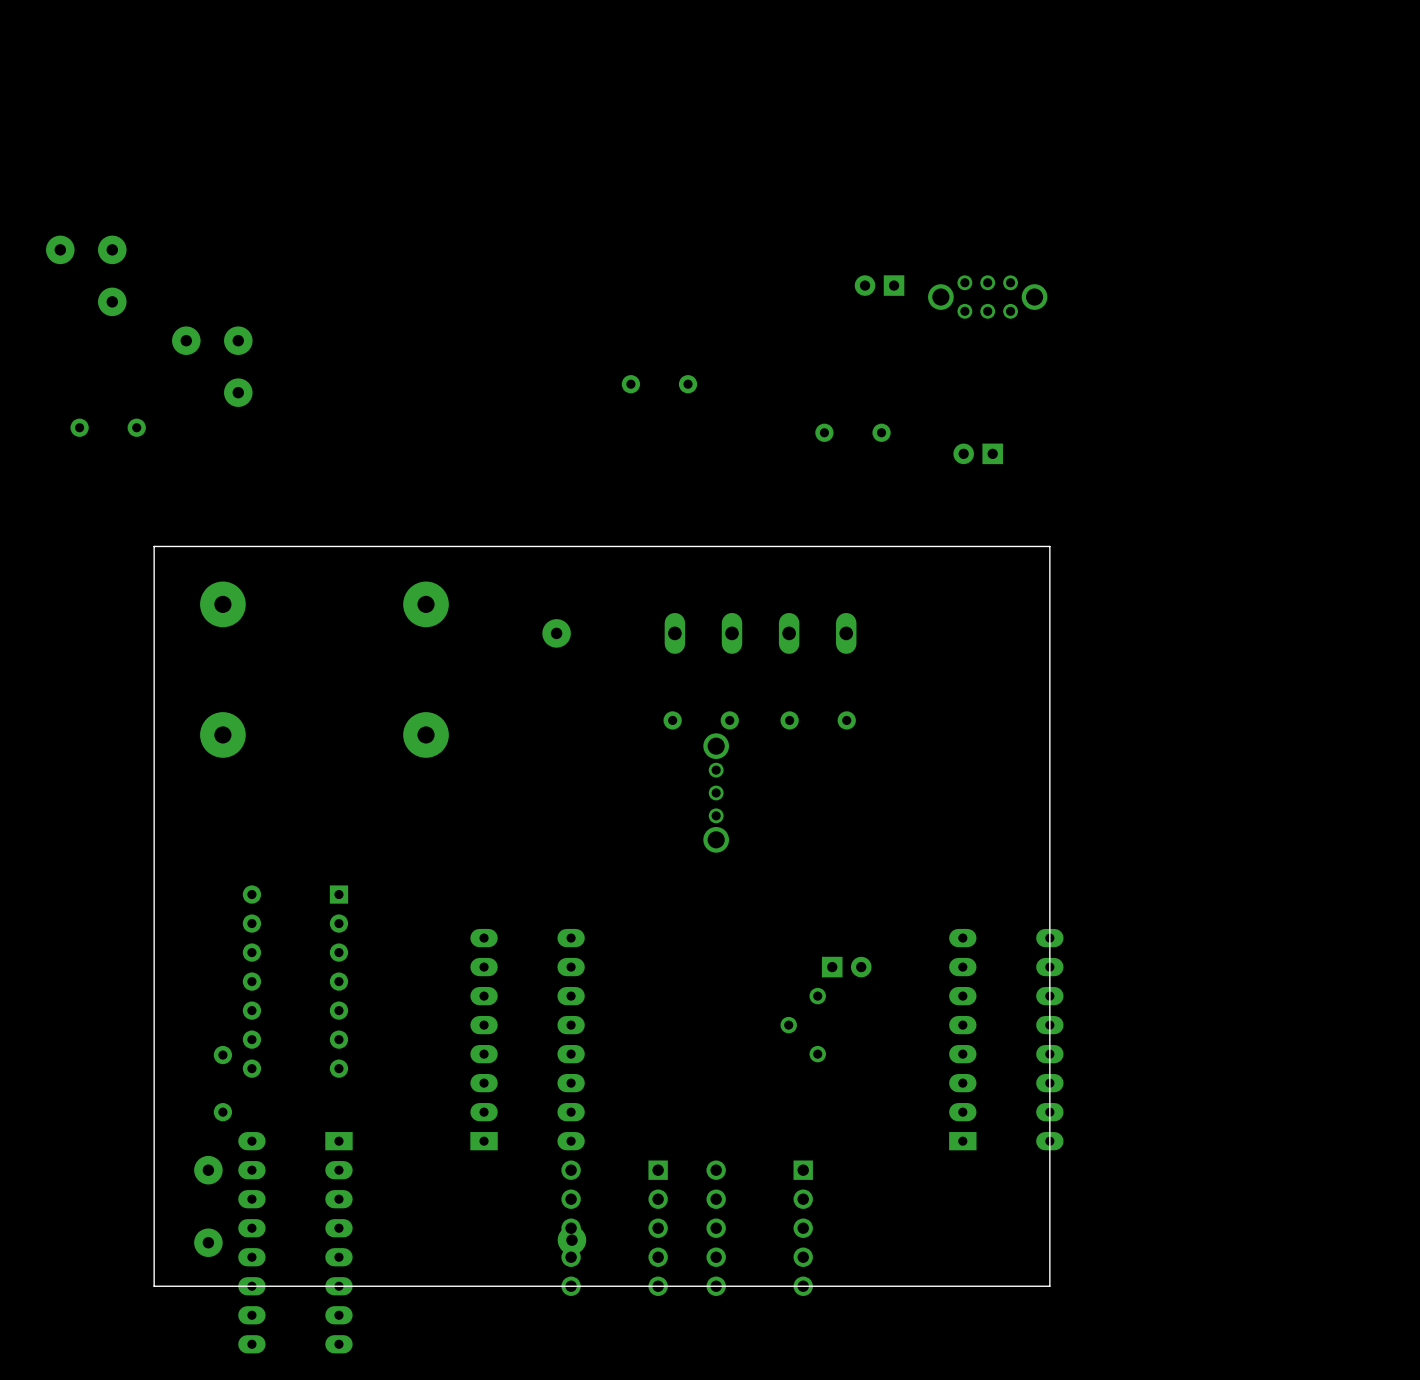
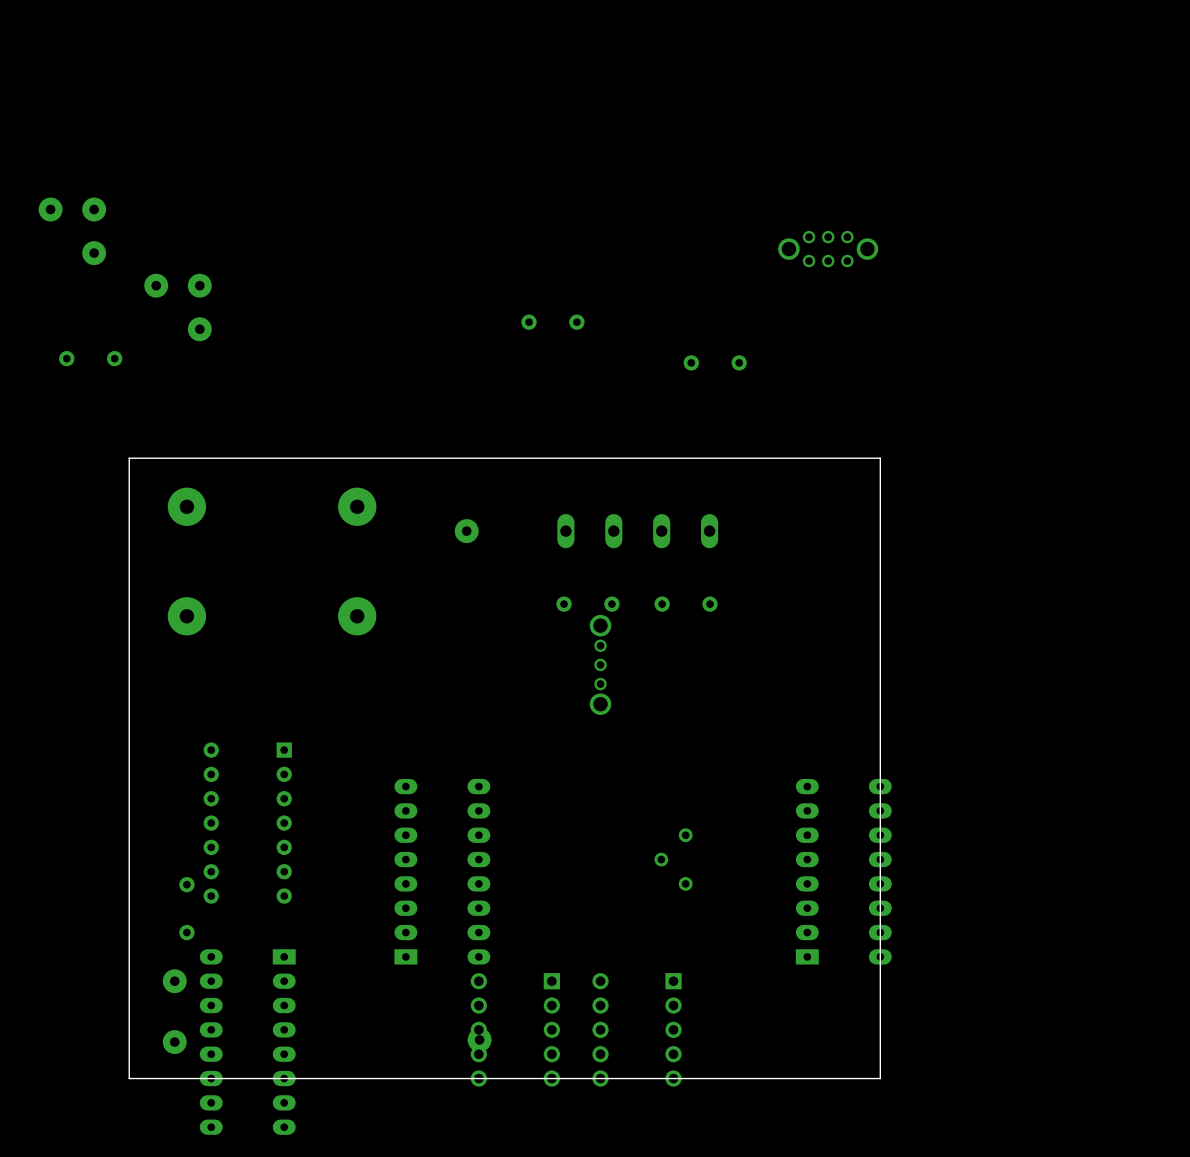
part: (879, 285) -> none
part: (978, 453) -> none
part: (846, 967) -> none

